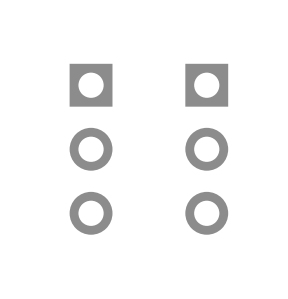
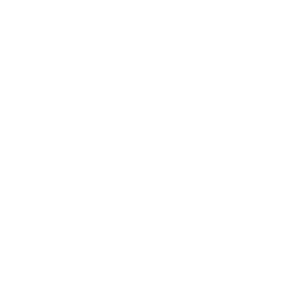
part: (91, 149) -> none
part: (206, 149) -> none

